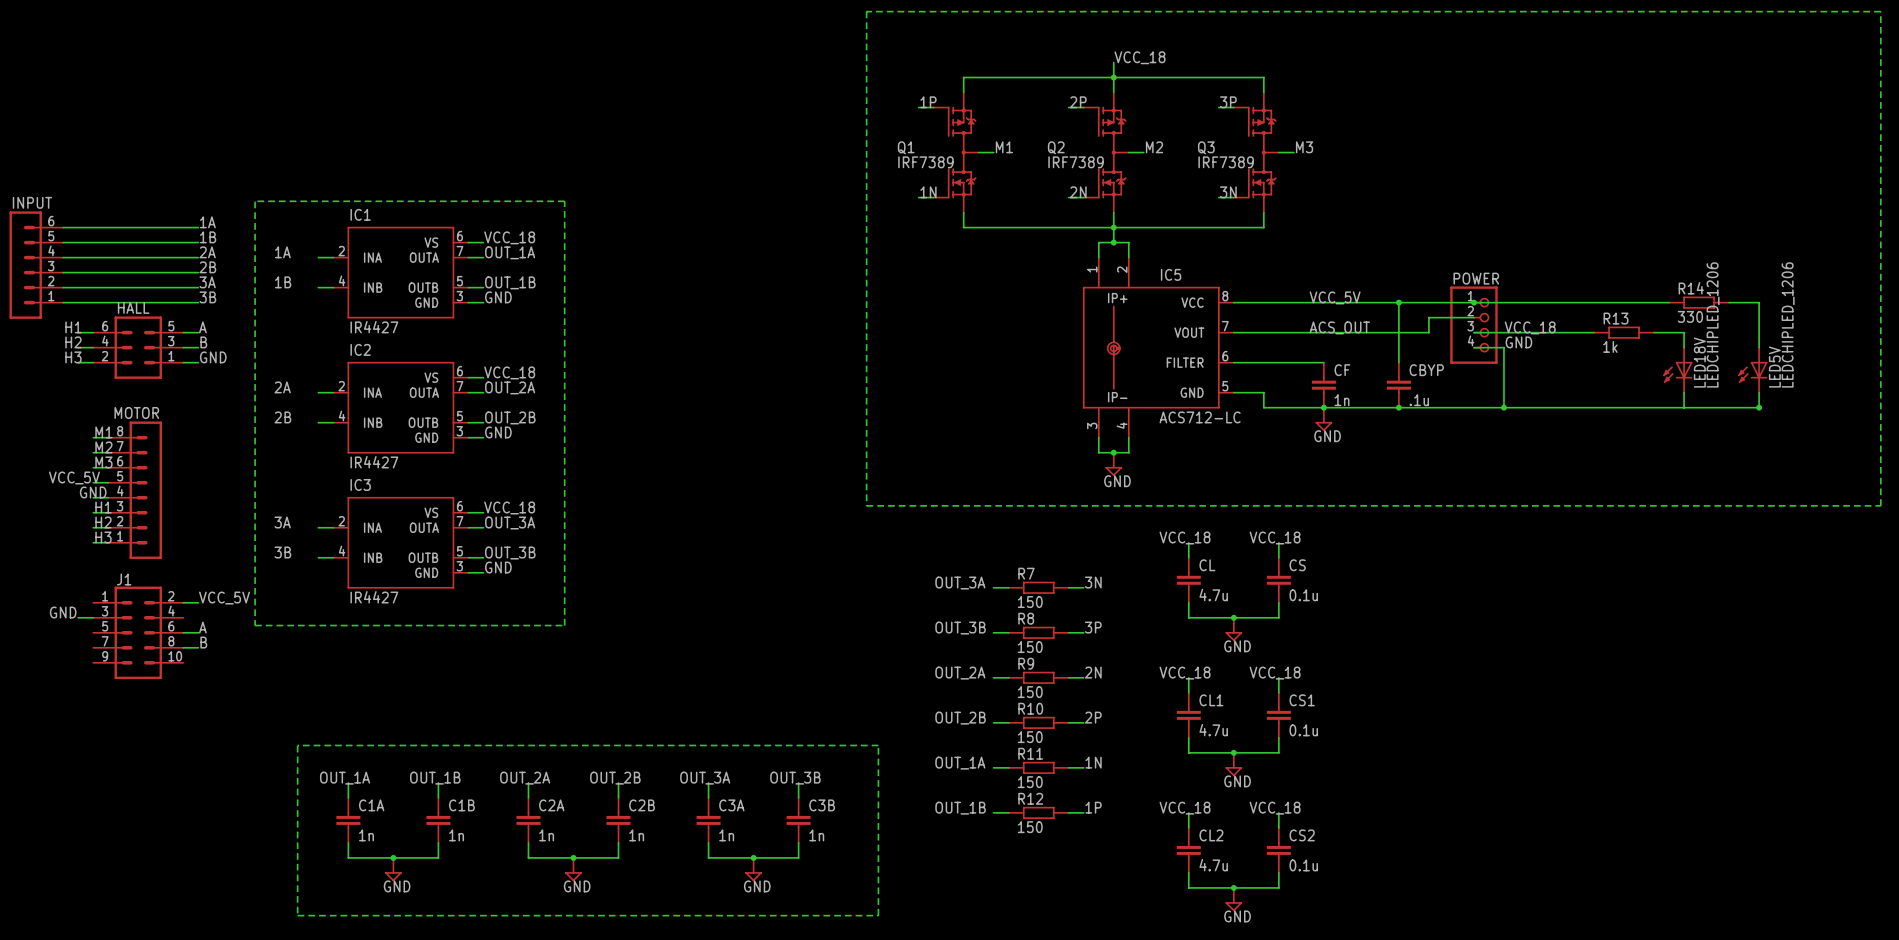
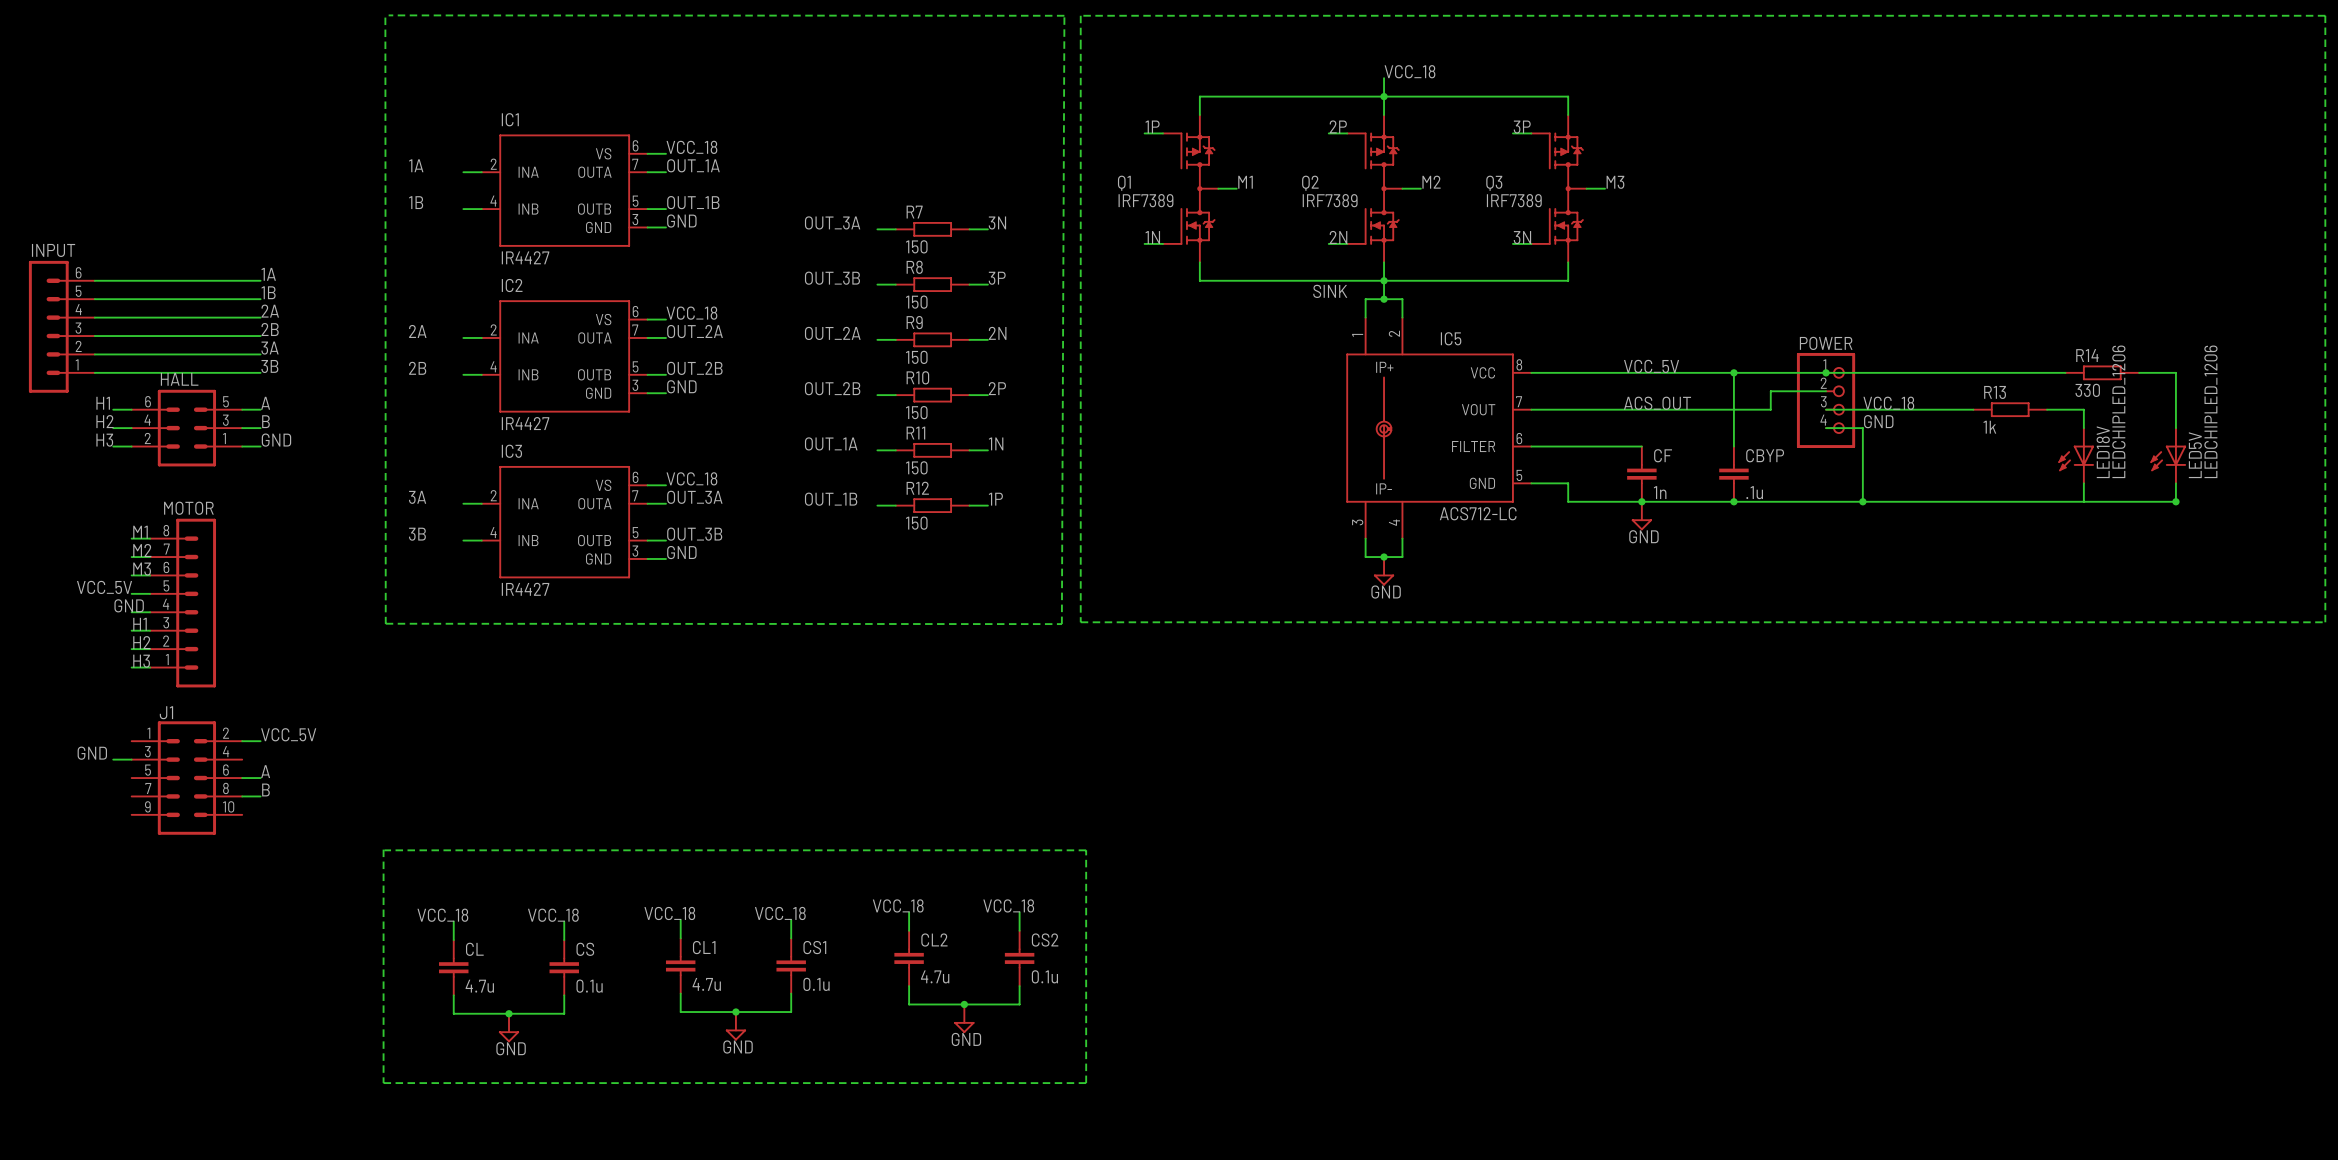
wire: none -> (388, 15) (1064, 15) (1061, 624) (385, 623) (385, 17)
label: none -> VCC_18 (691, 147)
label: none -> OUT_1A (693, 165)
label: none -> OUT_1B (693, 202)
label: none -> GND (681, 221)
label: none -> OUT_3A (832, 222)
label: none -> 3N (997, 222)
wire: none -> (877, 229) (895, 229)
wire: none -> (969, 229) (987, 229)
wire: (255, 201) (564, 201) (564, 625) (255, 625) (255, 201) -> none
label: none -> OUT_3B (832, 278)
label: none -> 3P (997, 278)
wire: none -> (877, 284) (895, 284)
wire: none -> (969, 284) (987, 284)
label: none -> SINK (1330, 291)
label position: VCC_18 (509, 237) -> VCC_18 (691, 313)
wire: (468, 242) (483, 242) -> (647, 153) (665, 153)
label position: 1A (282, 252) -> 1A (416, 165)
label: OUT_1A (510, 252) -> none
wire: (318, 257) (333, 257) -> (463, 172) (481, 172)
wire: (468, 257) (483, 257) -> (647, 172) (665, 172)
label: none -> OUT_2A (695, 331)
label: none -> 2N (997, 333)
label: none -> OUT_2A (832, 333)
IC1 position: (400, 272) -> (564, 190)
wire: none -> (877, 339) (895, 339)
wire: none -> (969, 339) (987, 339)
label position: 1B (283, 282) -> 1B (416, 202)
label: OUT_1B (510, 282) -> none
wire: (318, 287) (333, 287) -> (463, 209) (481, 209)
wire: (468, 287) (483, 287) -> (647, 209) (665, 209)
label position: GND (498, 297) -> GND (681, 386)
label: none -> OUT_2B (694, 368)
wire: (468, 302) (483, 302) -> (647, 227) (665, 227)
label: none -> 2P (997, 388)
label: none -> OUT_2B (832, 388)
wire: none -> (877, 395) (895, 395)
wire: none -> (969, 395) (987, 395)
label: none -> 1N (996, 443)
label: none -> OUT_1A (831, 443)
wire: none -> (877, 450) (895, 450)
wire: none -> (969, 450) (987, 450)
label position: VCC_18 (509, 372) -> VCC_18 (691, 478)
wire: (468, 377) (483, 377) -> (647, 319) (665, 319)
label position: 2A (282, 387) -> 2A (417, 331)
label: OUT_2A (510, 387) -> none
wire: (318, 392) (333, 392) -> (463, 337) (481, 337)
wire: (468, 392) (483, 392) -> (647, 337) (665, 337)
label: none -> 1P (995, 499)
label: none -> OUT_1B (831, 499)
IC2 position: (400, 407) -> (564, 356)
wire: none -> (877, 505) (895, 505)
wire: none -> (969, 505) (987, 505)
label position: 2B (282, 417) -> 2B (417, 368)
label: OUT_2B (510, 417) -> none
wire: (318, 422) (333, 422) -> (463, 374) (481, 374)
wire: (468, 422) (483, 422) -> (647, 374) (665, 374)
label position: GND (498, 432) -> GND (681, 552)
wire: (468, 437) (483, 437) -> (647, 393) (665, 393)
label: VCC_18 (509, 507) -> none
wire: (468, 512) (483, 512) -> (647, 485) (665, 485)
label position: 3A (282, 522) -> 3A (417, 497)
label position: OUT_3A (510, 523) -> OUT_3A (694, 497)
wire: (318, 527) (333, 527) -> (463, 503) (481, 503)
wire: (468, 527) (483, 527) -> (647, 503) (665, 503)
label: VCC_18 (1185, 538) -> none
label: VCC_18 (1275, 538) -> none
IC3 position: (400, 542) -> (564, 522)
wire: (1188, 542) (1188, 557) -> none
wire: (1278, 542) (1278, 557) -> none
label position: 3B (282, 552) -> 3B (417, 534)
label position: OUT_3B (510, 553) -> OUT_3B (694, 534)
wire: (318, 557) (333, 557) -> (463, 540) (481, 540)
wire: (468, 557) (483, 557) -> (647, 540) (665, 540)
label: GND (498, 567) -> none
wire: (468, 572) (483, 572) -> (647, 558) (665, 558)
CL: 4.7u (1188, 580) -> none
CS: 0.1u (1278, 580) -> none
label: 3N (1093, 582) -> none
label: OUT_3A (960, 583) -> none
wire: (993, 587) (1008, 587) -> none
R7 position: (1038, 587) -> (932, 229)
wire: (1068, 587) (1083, 587) -> none
wire: (1188, 602) (1188, 617) (1278, 617) (1278, 602) -> none
junction: (1233, 617) -> none
label: 3P (1093, 627) -> none
label: OUT_3B (960, 628) -> none
power symbol: GND (1233, 629) -> none
wire: (993, 632) (1008, 632) -> none
R8 position: (1038, 632) -> (932, 284)
wire: (1068, 632) (1083, 632) -> none
label: 2N (1093, 672) -> none
label: OUT_2A (960, 673) -> none
label: VCC_18 (1185, 673) -> none
label: VCC_18 (1275, 673) -> none
wire: (993, 677) (1008, 677) -> none
R9 position: (1038, 677) -> (932, 339)
wire: (1068, 677) (1083, 677) -> none
wire: (1188, 677) (1188, 692) -> none
wire: (1278, 677) (1278, 692) -> none
wire: none -> (383, 849) (383, 1083) (1086, 1083) (1086, 850) (384, 850)
CL1 position: (1188, 715) -> (680, 965)
CS1 position: (1278, 715) -> (791, 965)
label: 2P (1093, 717) -> none
label: OUT_2B (960, 718) -> none
wire: (993, 722) (1008, 722) -> none
R10 position: (1038, 722) -> (932, 395)
wire: (1068, 722) (1083, 722) -> none
label: none -> VCC_18 (898, 905)
label: none -> VCC_18 (1008, 905)
wire: (1188, 737) (1188, 752) (1278, 752) (1278, 737) -> none
label: none -> VCC_18 (669, 913)
label: none -> VCC_18 (780, 913)
wire: (297, 745) (878, 745) (878, 915) (297, 915) (297, 745) -> none
label: none -> VCC_18 (442, 915)
label: none -> VCC_18 (553, 915)
junction: (1233, 752) -> none
label: 1N (1093, 762) -> none
label: OUT_1A (960, 763) -> none
power symbol: GND (1233, 764) -> none
wire: (993, 767) (1008, 767) -> none
R11 position: (1038, 767) -> (932, 450)
wire: (1068, 767) (1083, 767) -> none
label: OUT_1A (345, 778) -> none
label: OUT_1B (435, 778) -> none
label: OUT_2A (525, 778) -> none
label: OUT_2B (615, 778) -> none
label: OUT_3A (705, 778) -> none
label: OUT_3B (795, 778) -> none
wire: (348, 782) (348, 797) -> (453, 921) (453, 940)
wire: (438, 782) (438, 797) -> (564, 921) (564, 940)
wire: (528, 782) (528, 797) -> (680, 919) (680, 938)
wire: (618, 782) (618, 797) -> (791, 919) (791, 938)
wire: (708, 782) (708, 797) -> (909, 912) (909, 930)
wire: (798, 782) (798, 797) -> (1019, 912) (1019, 930)
CL: none -> 4.7u (453, 967)
CS: none -> 0.1u (564, 967)
label: 1P (1093, 807) -> none
label: OUT_1B (960, 808) -> none
label: VCC_18 (1185, 808) -> none
label: VCC_18 (1275, 808) -> none
wire: (993, 812) (1008, 812) -> none
R12 position: (1038, 812) -> (932, 505)
wire: (1068, 812) (1083, 812) -> none
wire: (1188, 812) (1188, 827) -> none
wire: (1278, 812) (1278, 827) -> none
junction: none -> (964, 1004)
C1A: 1n (348, 820) -> none
C1B: 1n (438, 820) -> none
C2A: 1n (528, 820) -> none
C2B: 1n (618, 820) -> none
C3A: 1n (708, 820) -> none
C3B: 1n (798, 820) -> none
junction: none -> (735, 1012)
wire: (348, 842) (348, 857) (438, 857) (438, 842) -> (453, 995) (453, 1013) (564, 1013) (564, 995)
wire: (528, 842) (528, 857) (618, 857) (618, 842) -> (680, 993) (680, 1012) (791, 1012) (791, 993)
wire: (708, 842) (708, 857) (798, 857) (798, 842) -> (909, 986) (909, 1004) (1019, 1004) (1019, 986)
CL2 position: (1188, 850) -> (909, 958)
CS2 position: (1278, 850) -> (1019, 958)
junction position: (393, 857) -> (509, 1013)
junction: (573, 857) -> none
junction: (753, 857) -> none
power symbol position: GND (393, 869) -> GND (509, 1028)
power symbol position: GND (573, 869) -> GND (735, 1026)
power symbol position: GND (753, 869) -> GND (964, 1018)
wire: (1188, 872) (1188, 887) (1278, 887) (1278, 872) -> none
junction: (1233, 887) -> none
power symbol: GND (1233, 899) -> none

